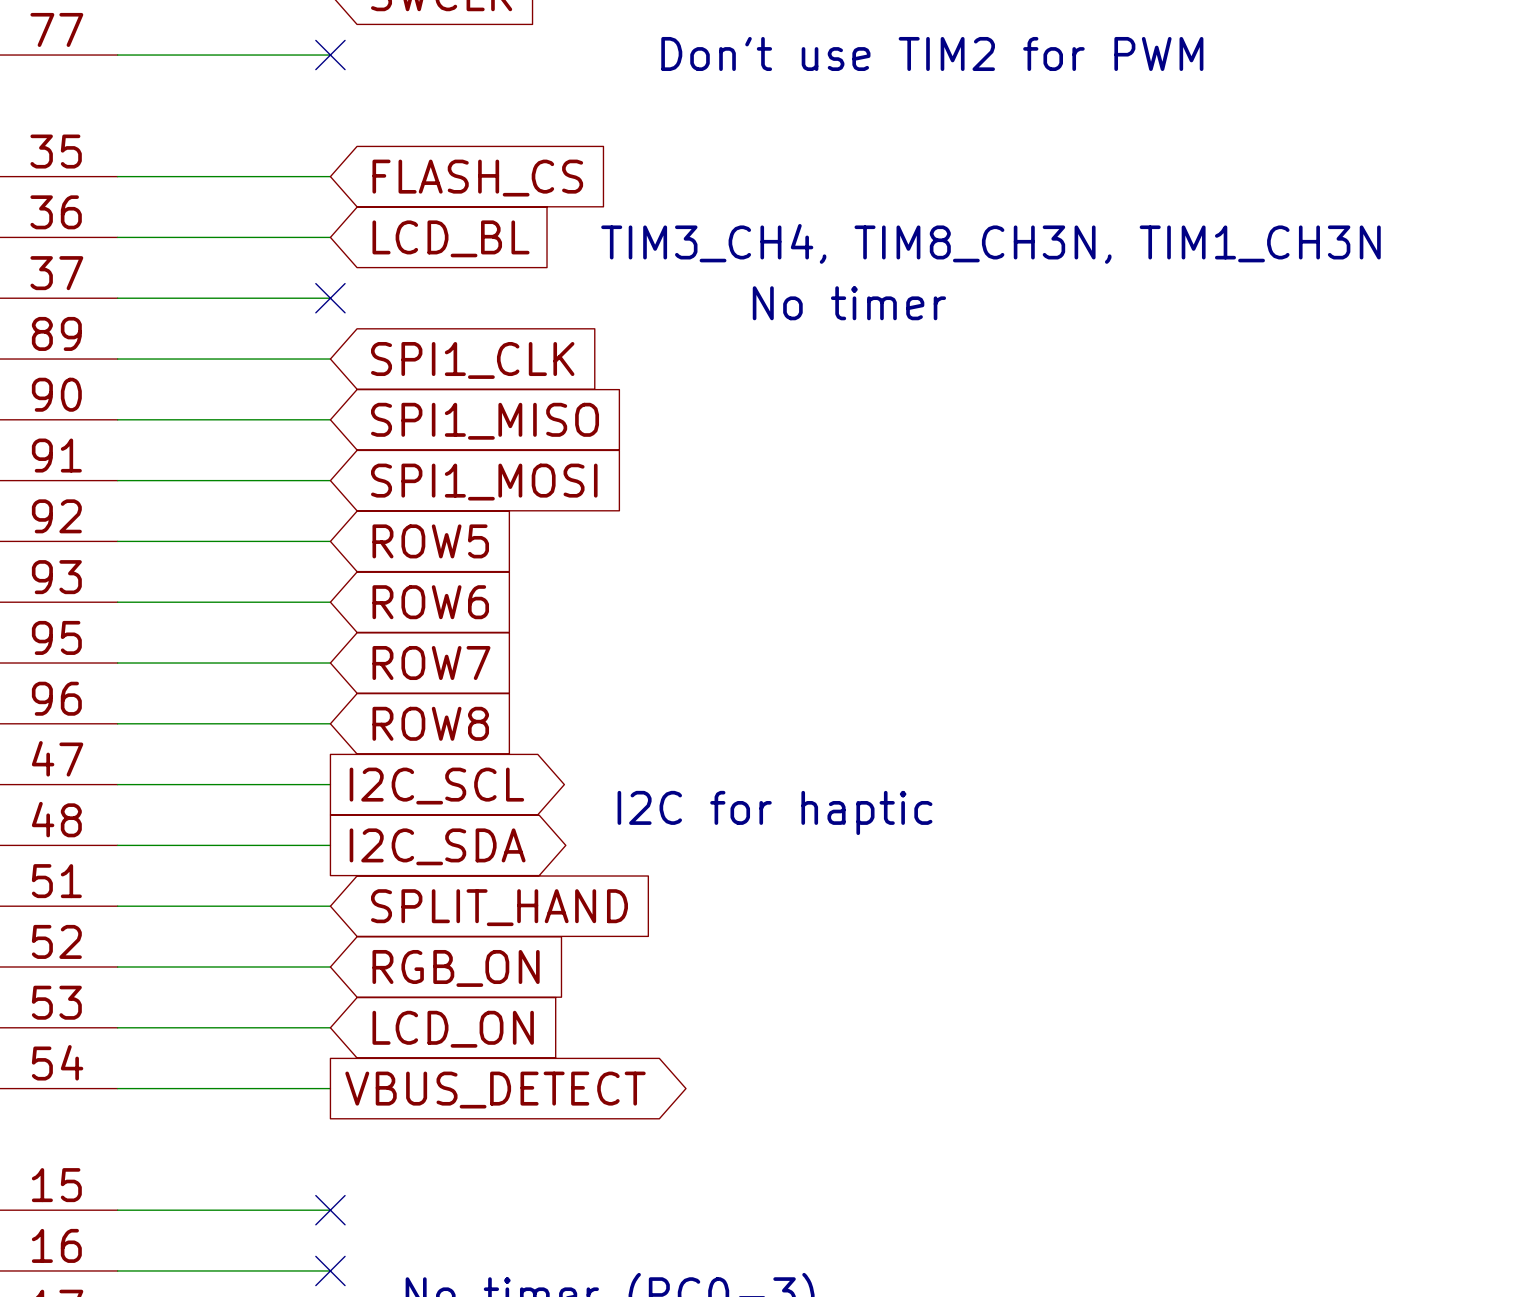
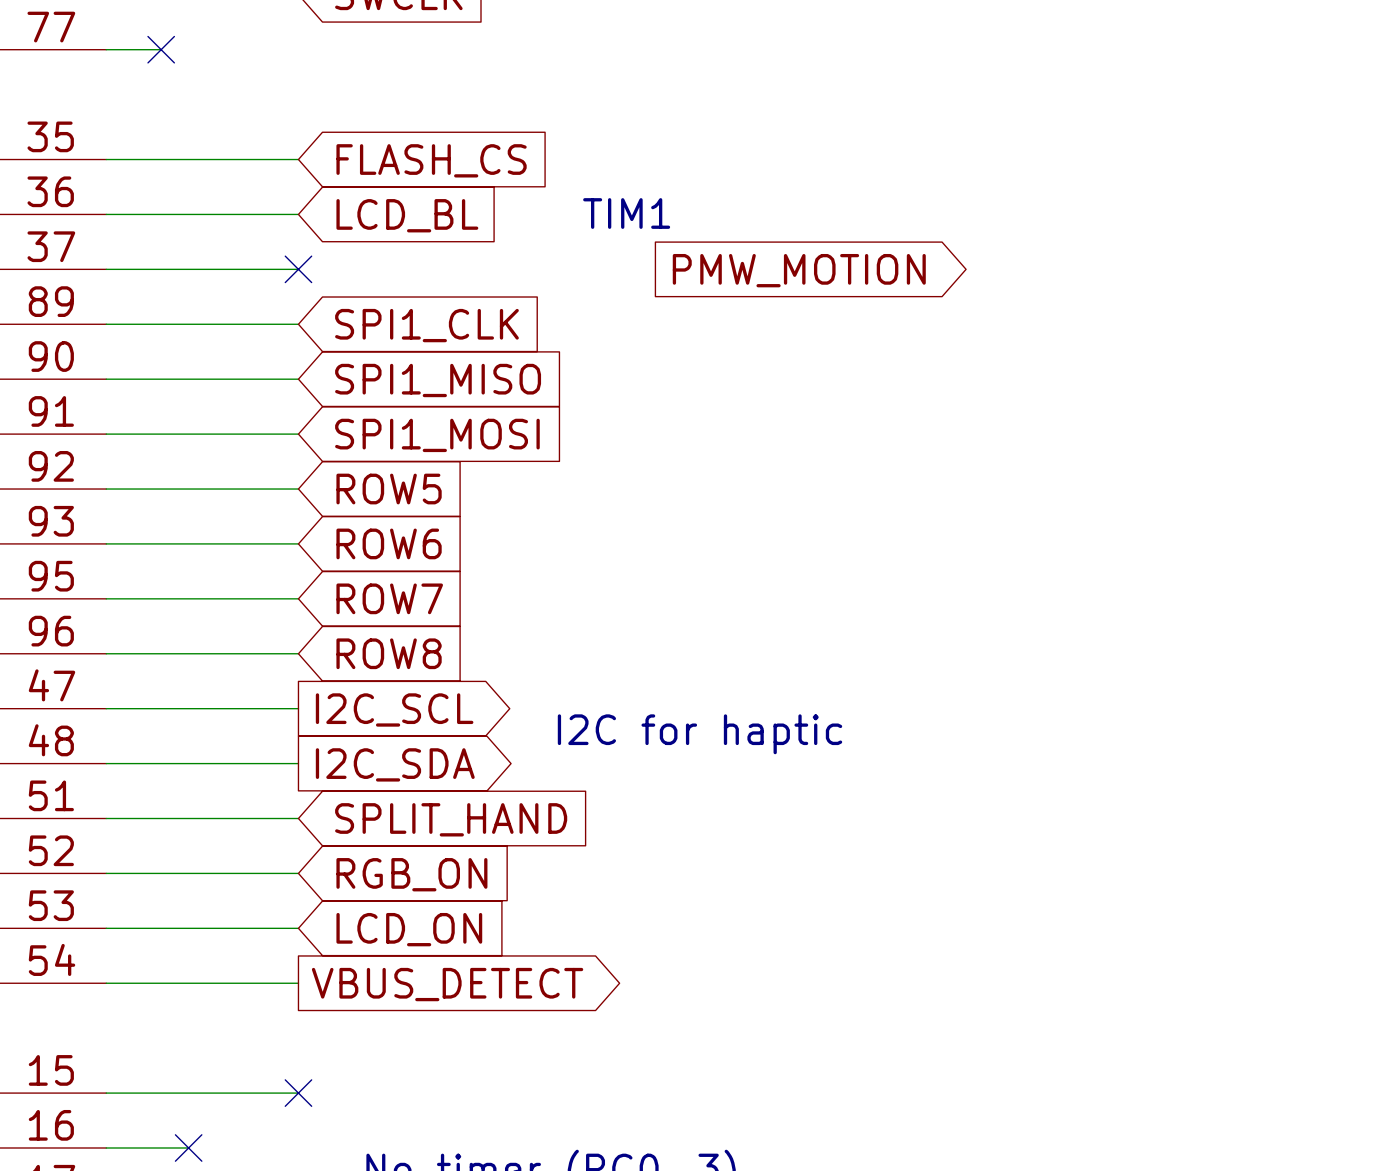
text: Don't use TIM2 for PWM (932, 53) -> none
wire: (178, 55) (330, 55) -> none
no-connect mark: none -> (161, 49)
no-connect mark: (330, 55) -> none
text: none -> TIM1 (626, 213)
text: TIM3_CH4, TIM8_CH3N, TIM1_CH3N (990, 243) -> none
global label: none -> PMW_MOTION (799, 270)
text: No timer (849, 303) -> none
wire: (208, 1270) (330, 1270) -> none
no-connect mark position: (330, 1270) -> (188, 1147)

